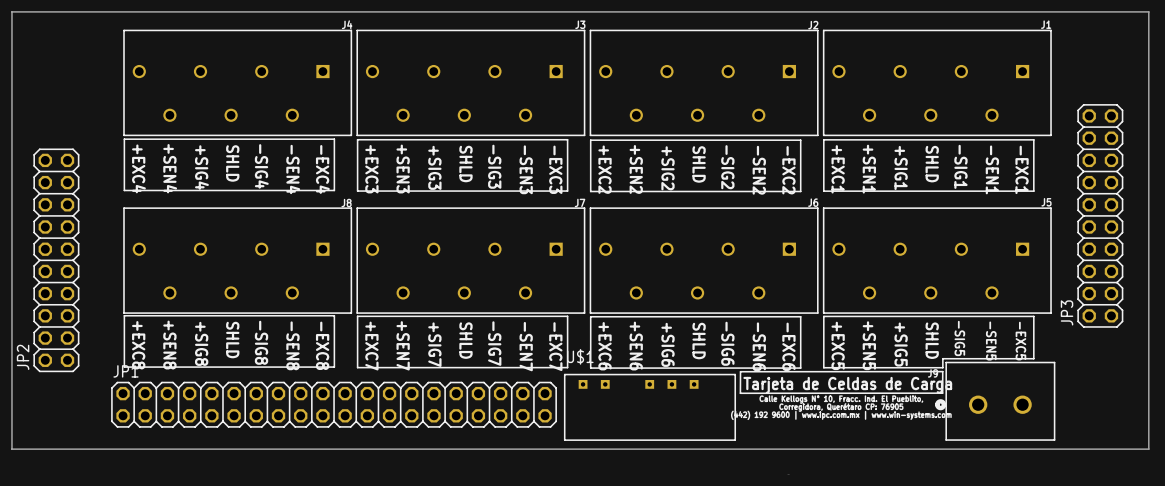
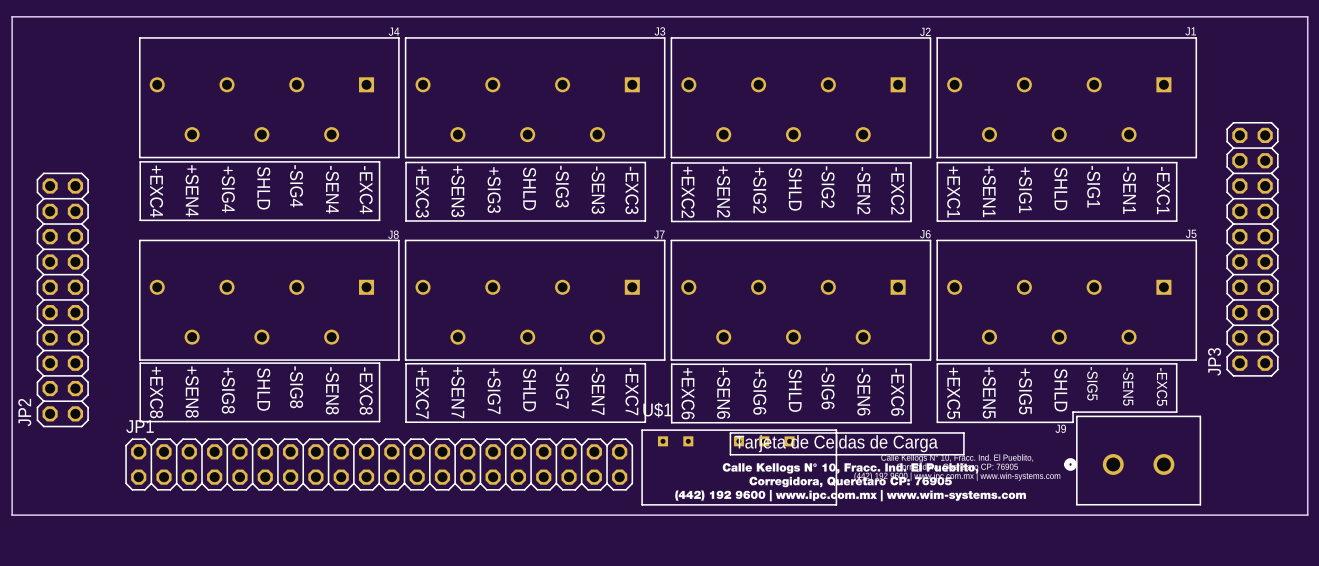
line: (942, 371) (740, 371) (740, 393) (942, 393) (942, 371) -> none
line: none -> (730, 432) (963, 432) (963, 454) (730, 454) (730, 432)
text position: Tarjeta de Celdas de Carga (847, 385) -> Tarjeta de Celdas de Carga (836, 443)
drawing: none -> [675, 463, 1026, 502]

